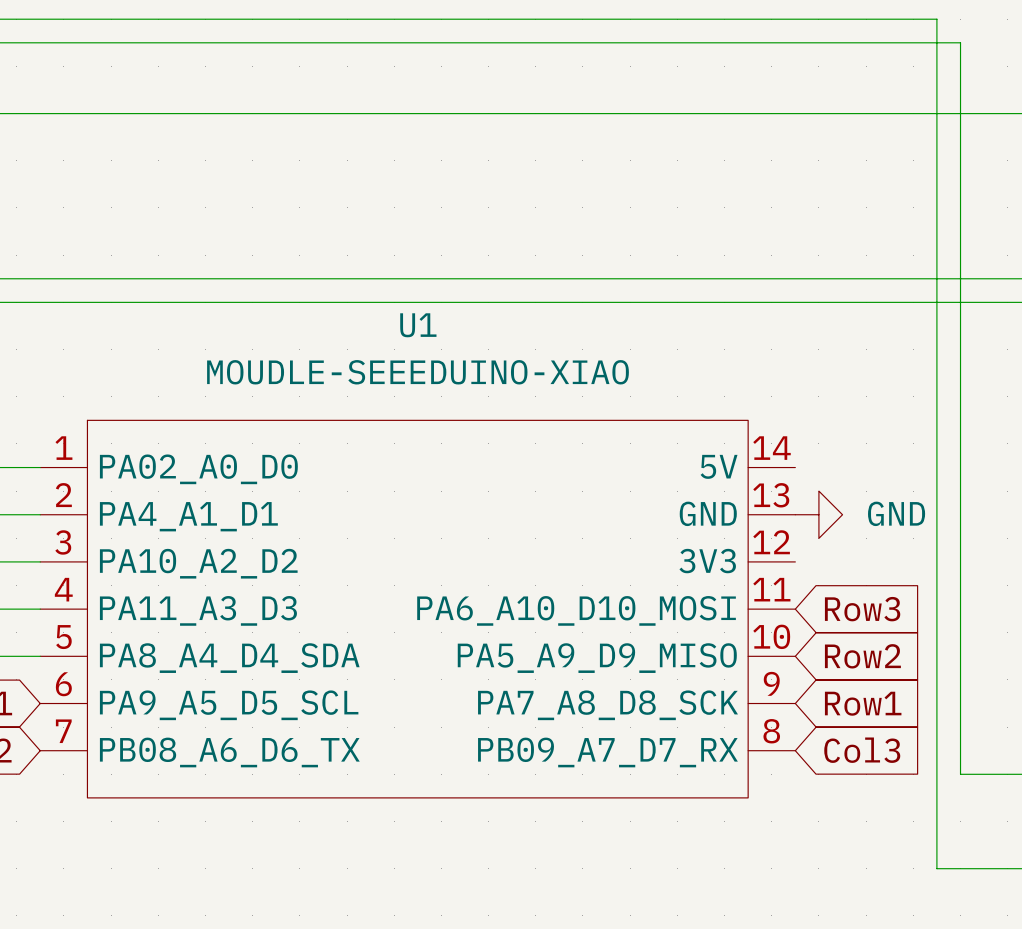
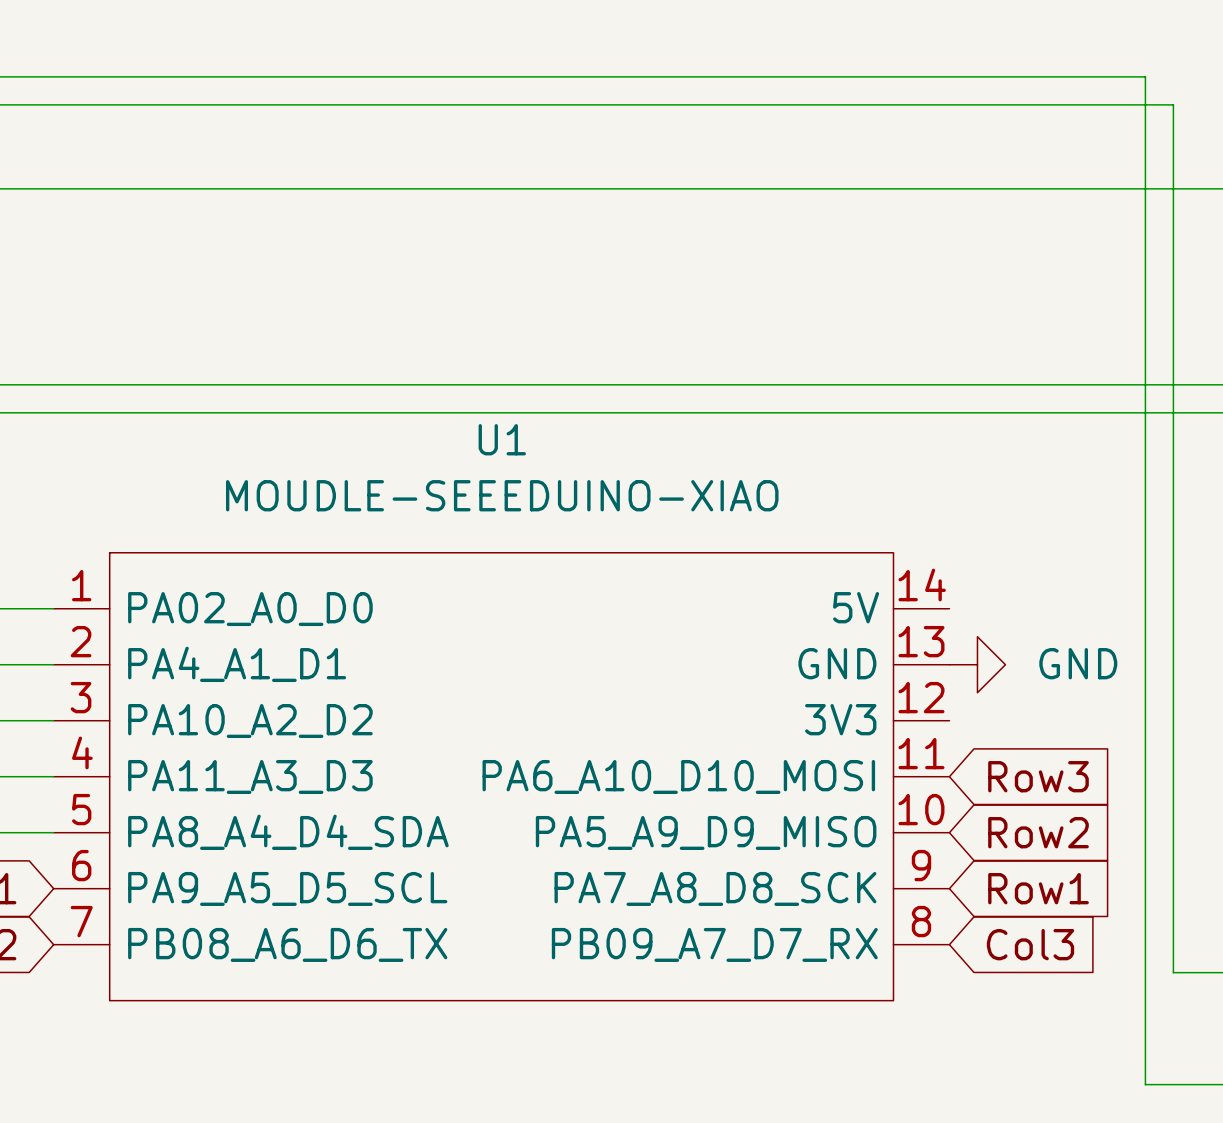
wire: (936, 19) (936, 868) (960, 868) -> (1117, 76) (1145, 76) (1145, 104) (1173, 104) (1173, 972)
wire: (960, 774) (984, 774) -> (1145, 972) (1145, 1084)

